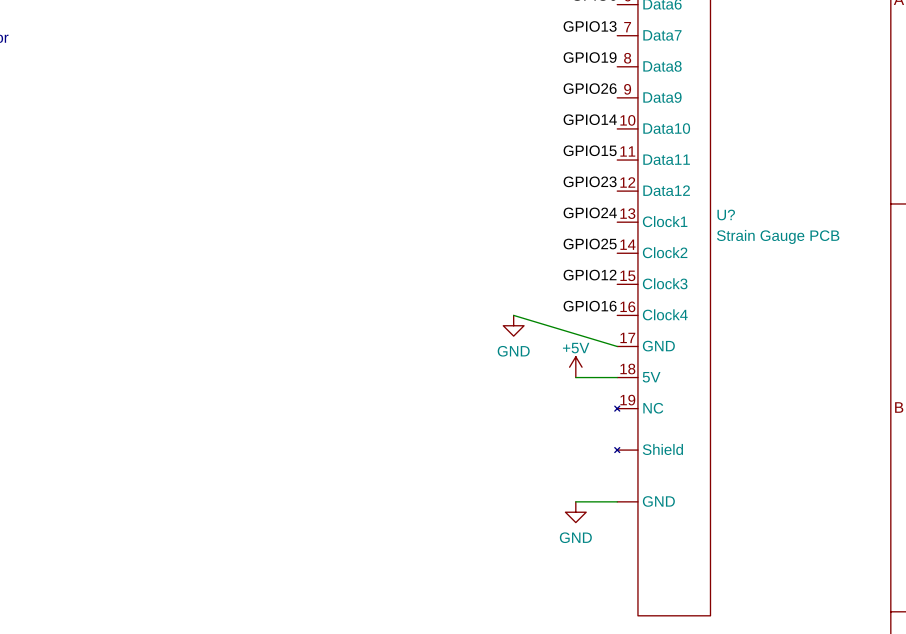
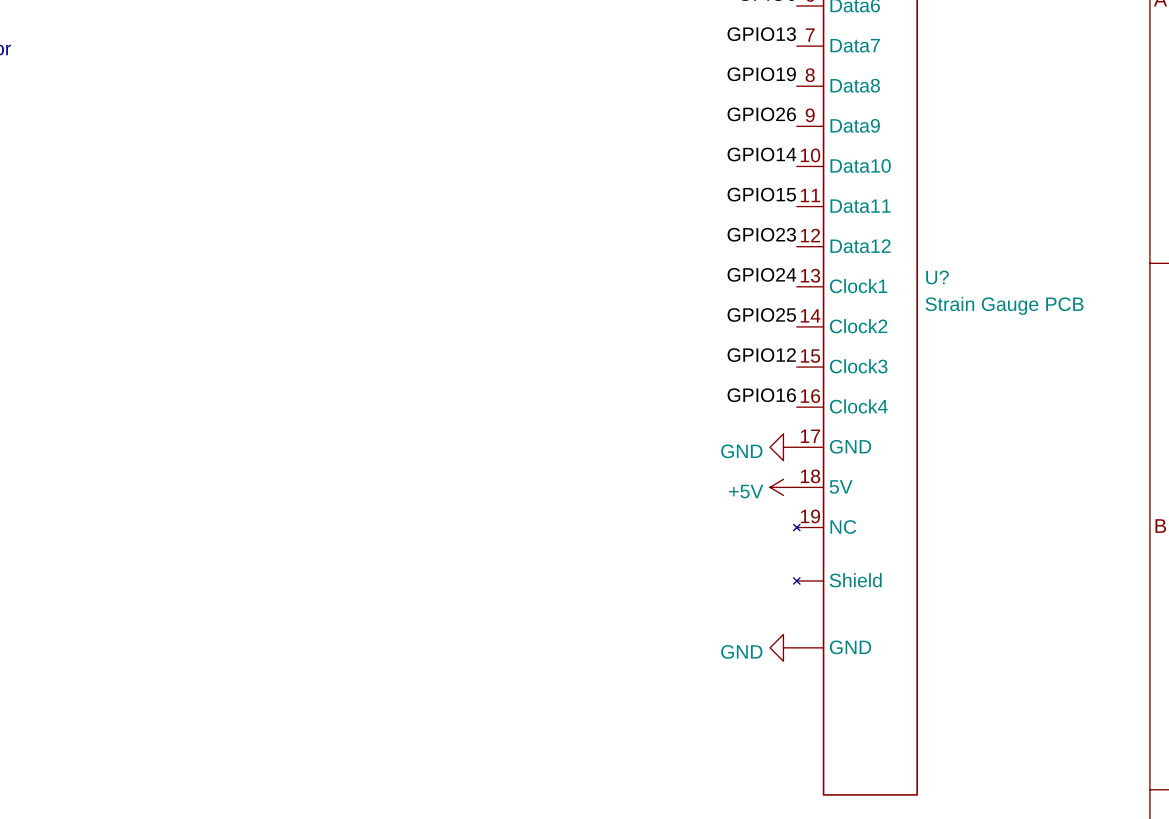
wire: (513, 315) (617, 346) -> none
power symbol: GND (513, 325) -> none
power symbol: none -> GND (783, 447)
power symbol text position: +5V (576, 348) -> +5V (746, 491)
power symbol rotation: 0° (575, 367) -> 90° counterclockwise (783, 487)
power symbol position: +5V (575, 367) -> +5V (783, 487)
wire: (575, 501) (617, 501) -> none
power symbol rotation: 0° (575, 512) -> 90° clockwise (783, 647)
power symbol position: GND (575, 512) -> GND (783, 647)

